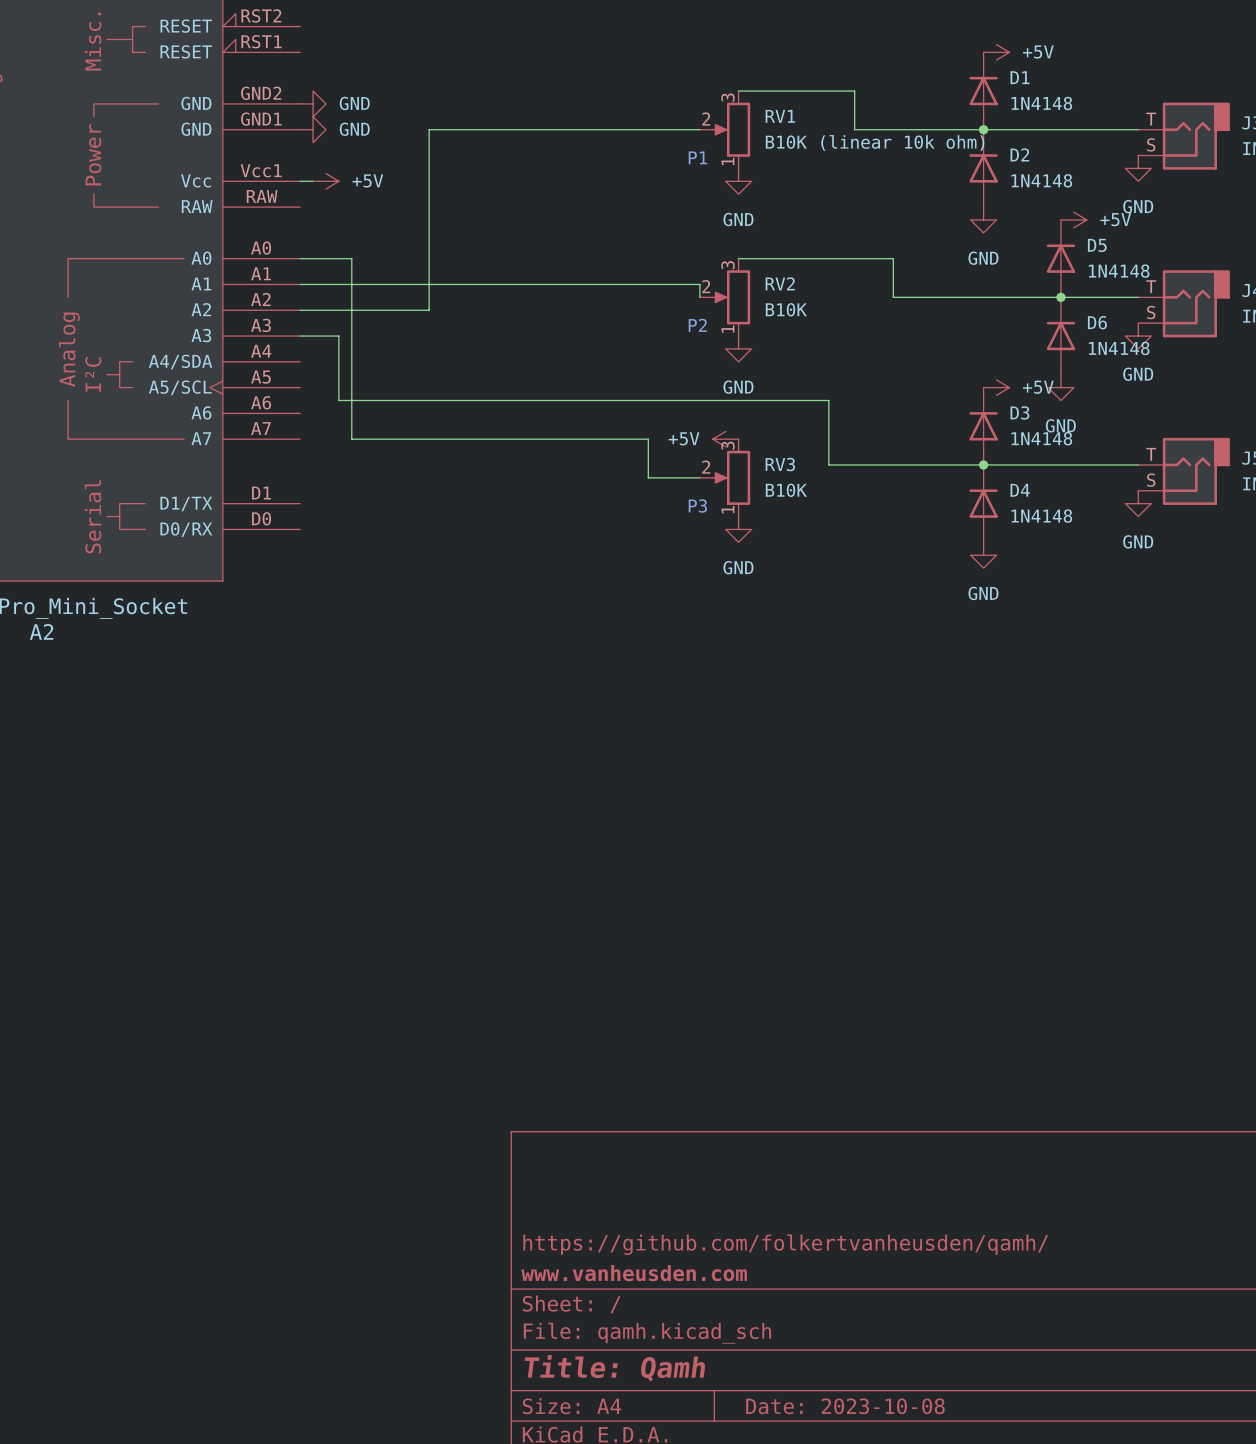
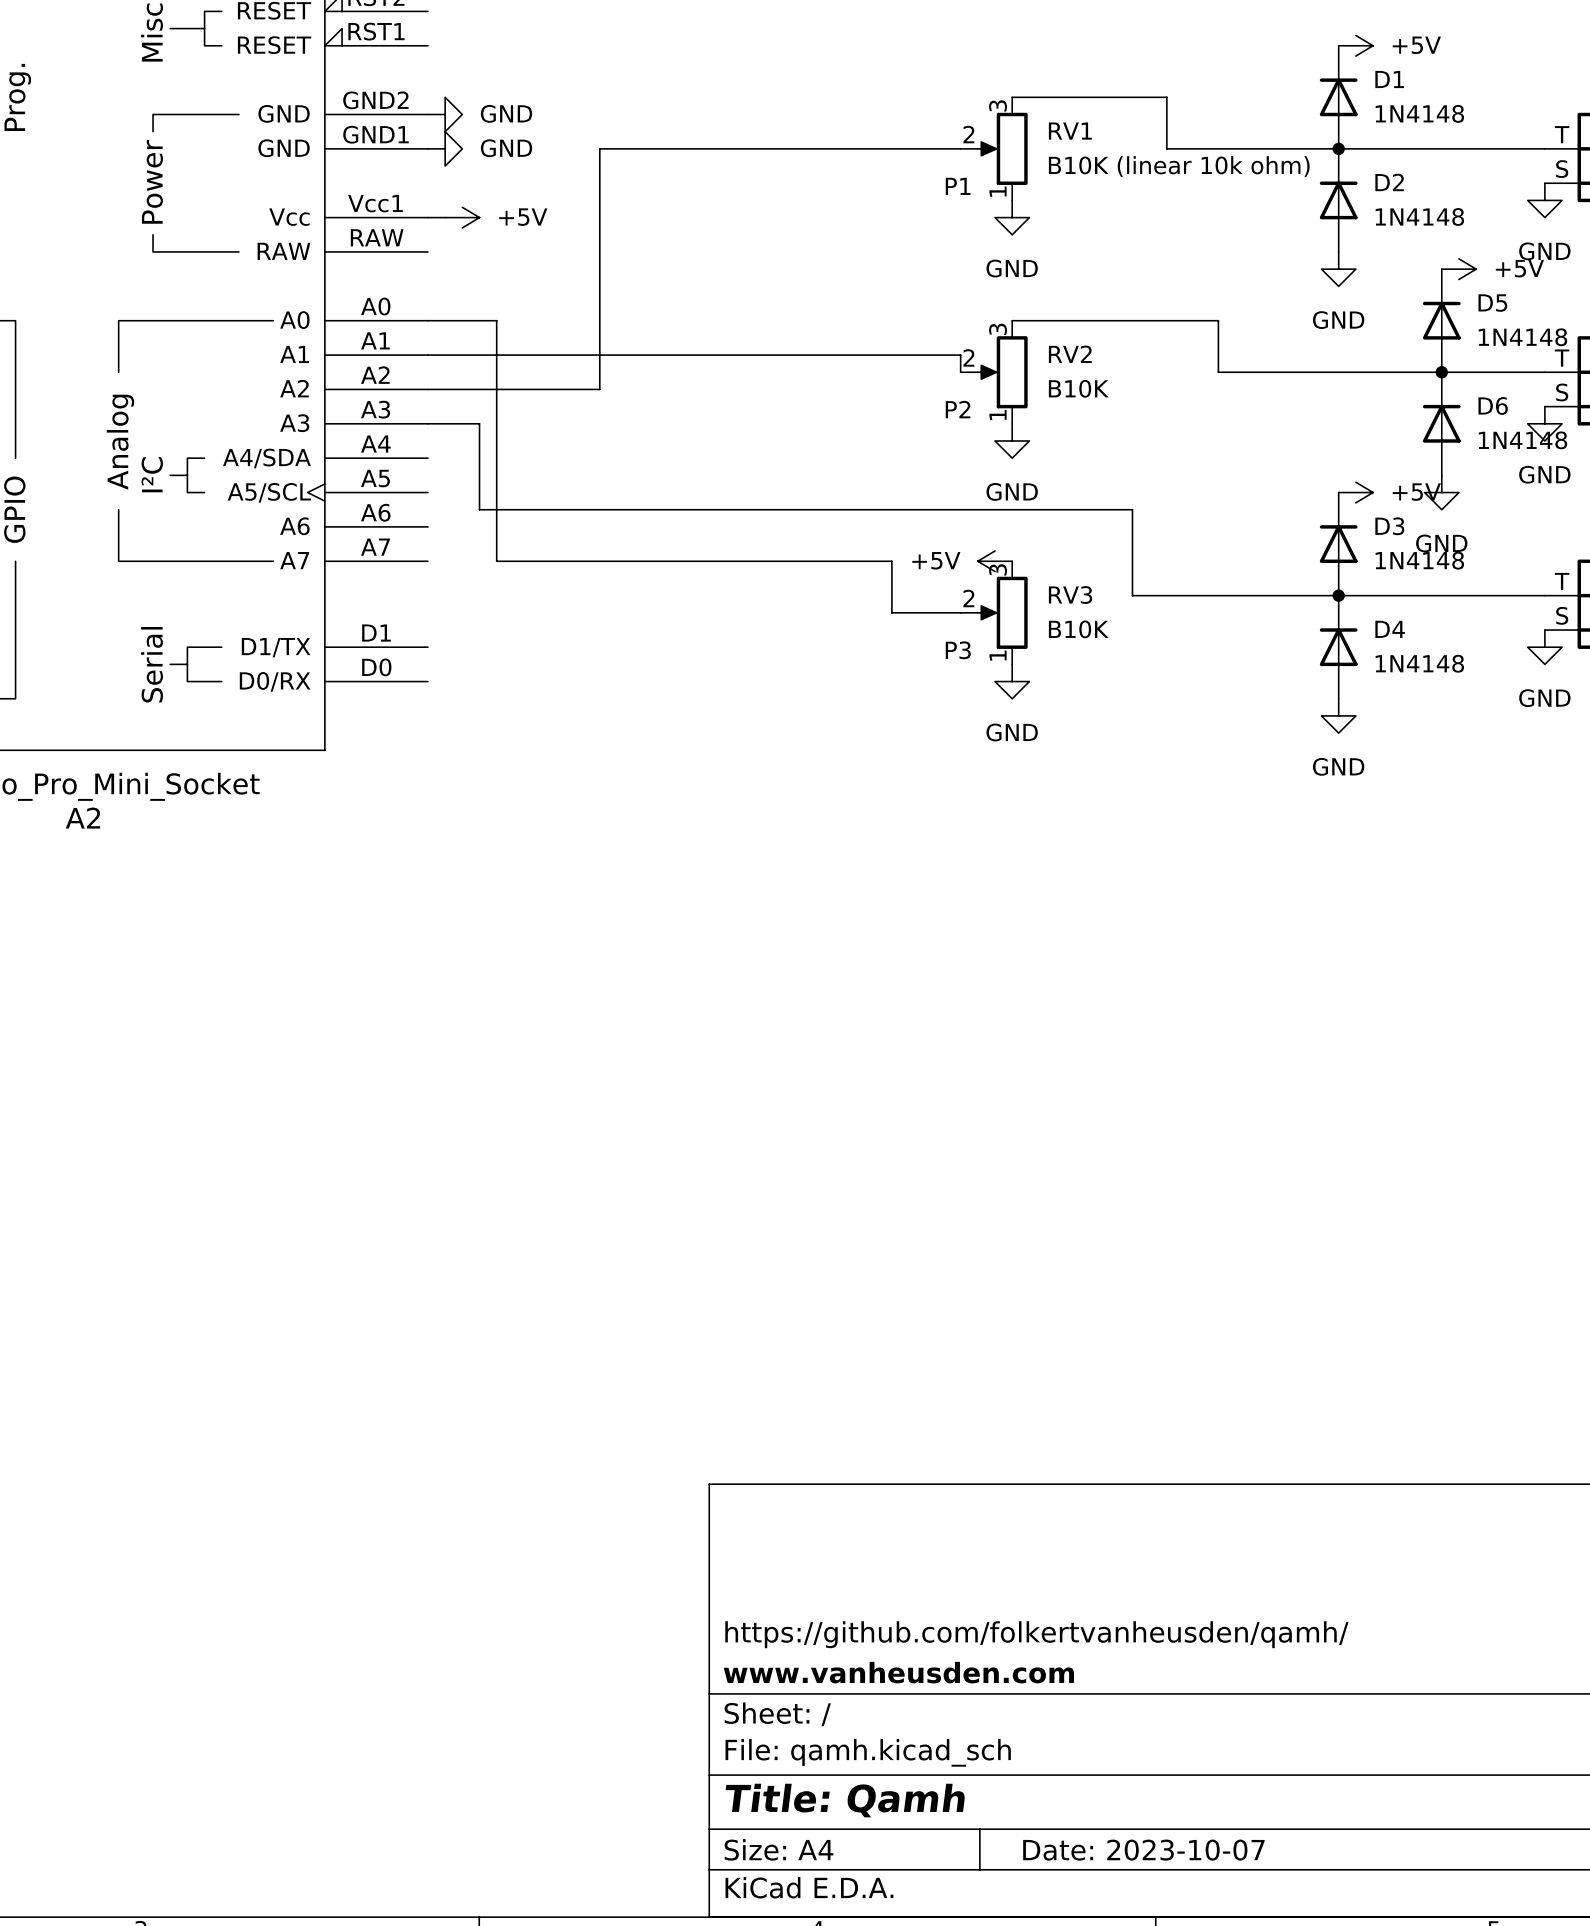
title block: Date: 2023-10-08 (845, 1406) -> Date: 2023-10-07 (1143, 1850)

